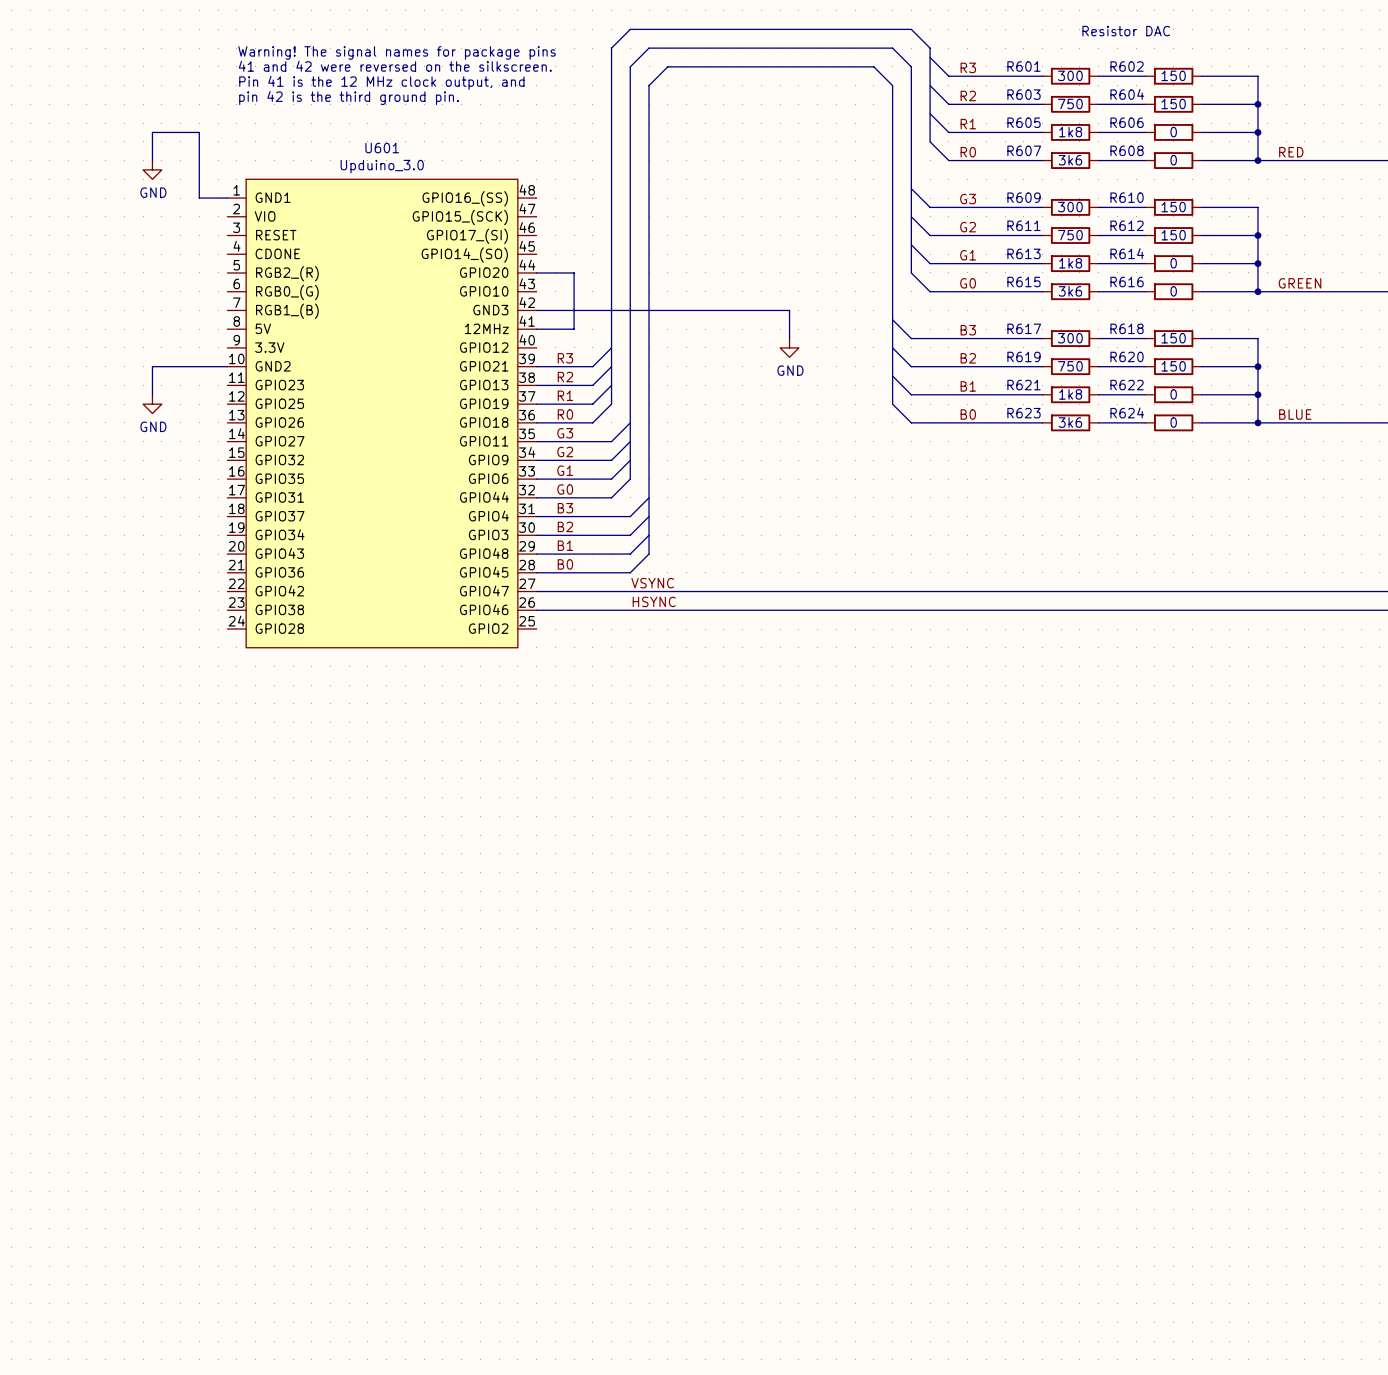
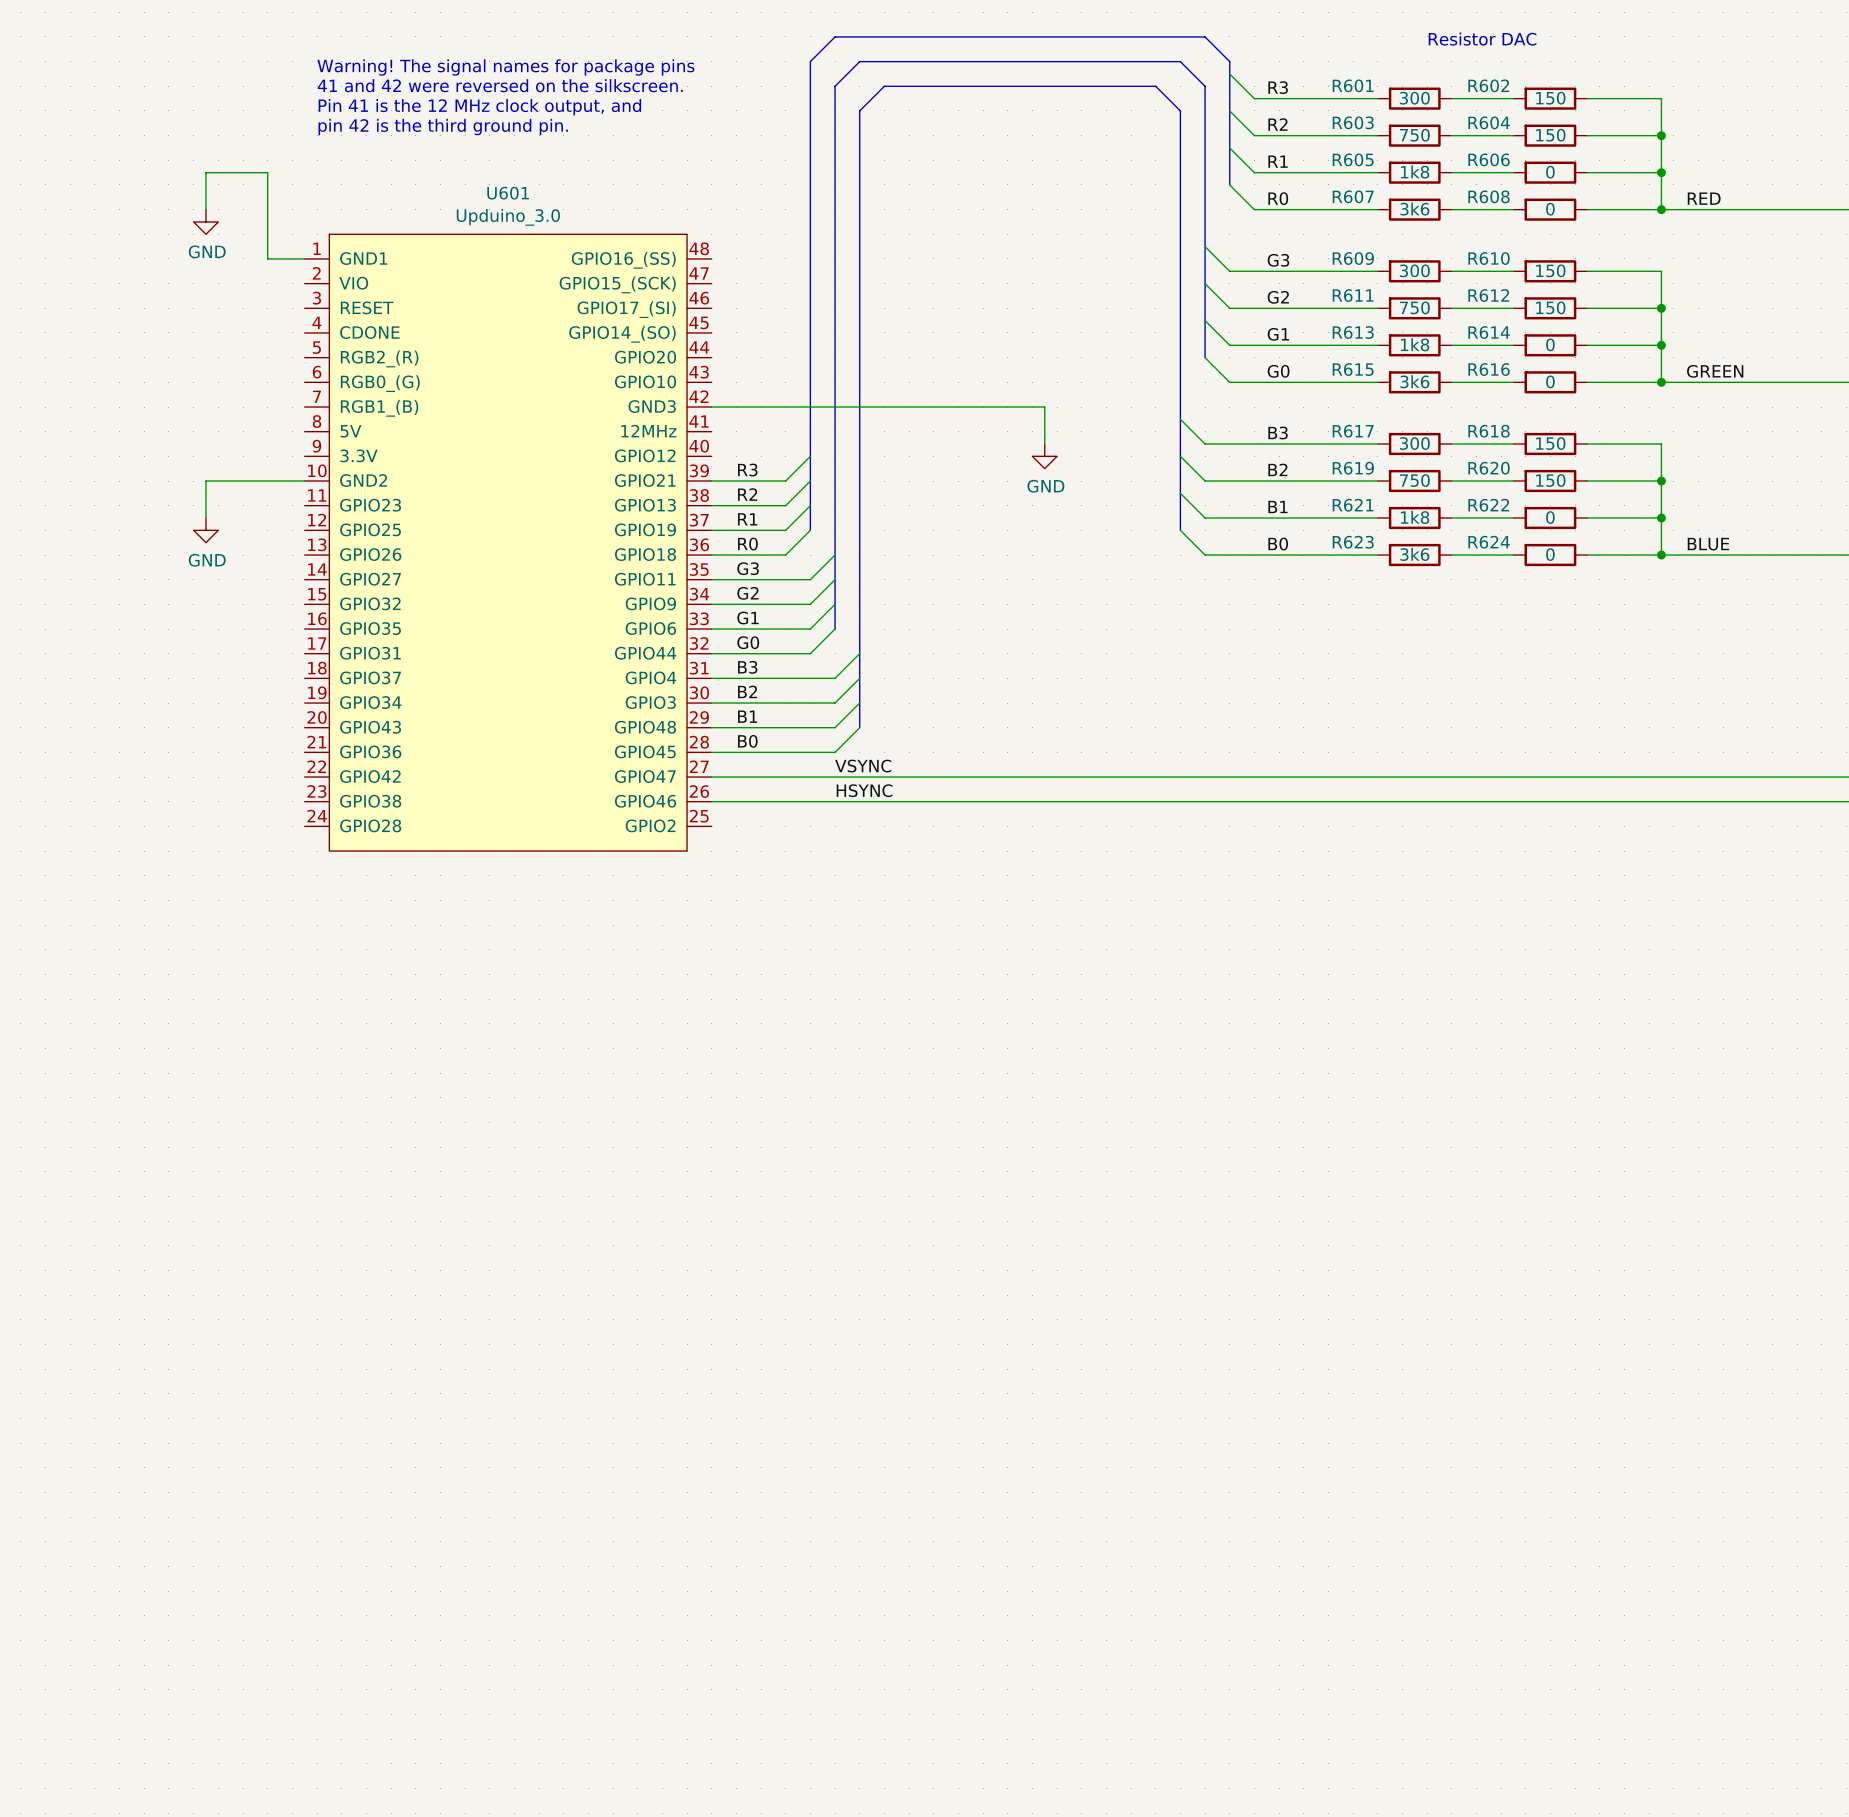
wire: (536, 272) (574, 272) (574, 329) (536, 329) -> none

